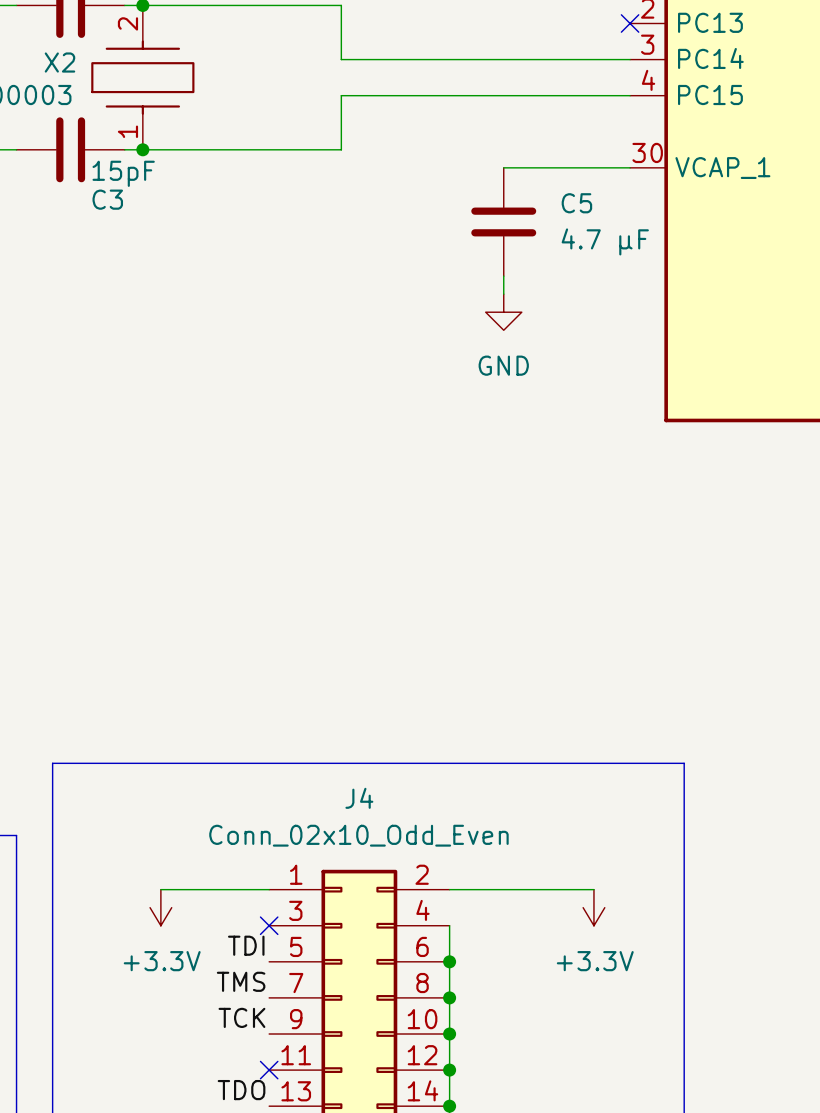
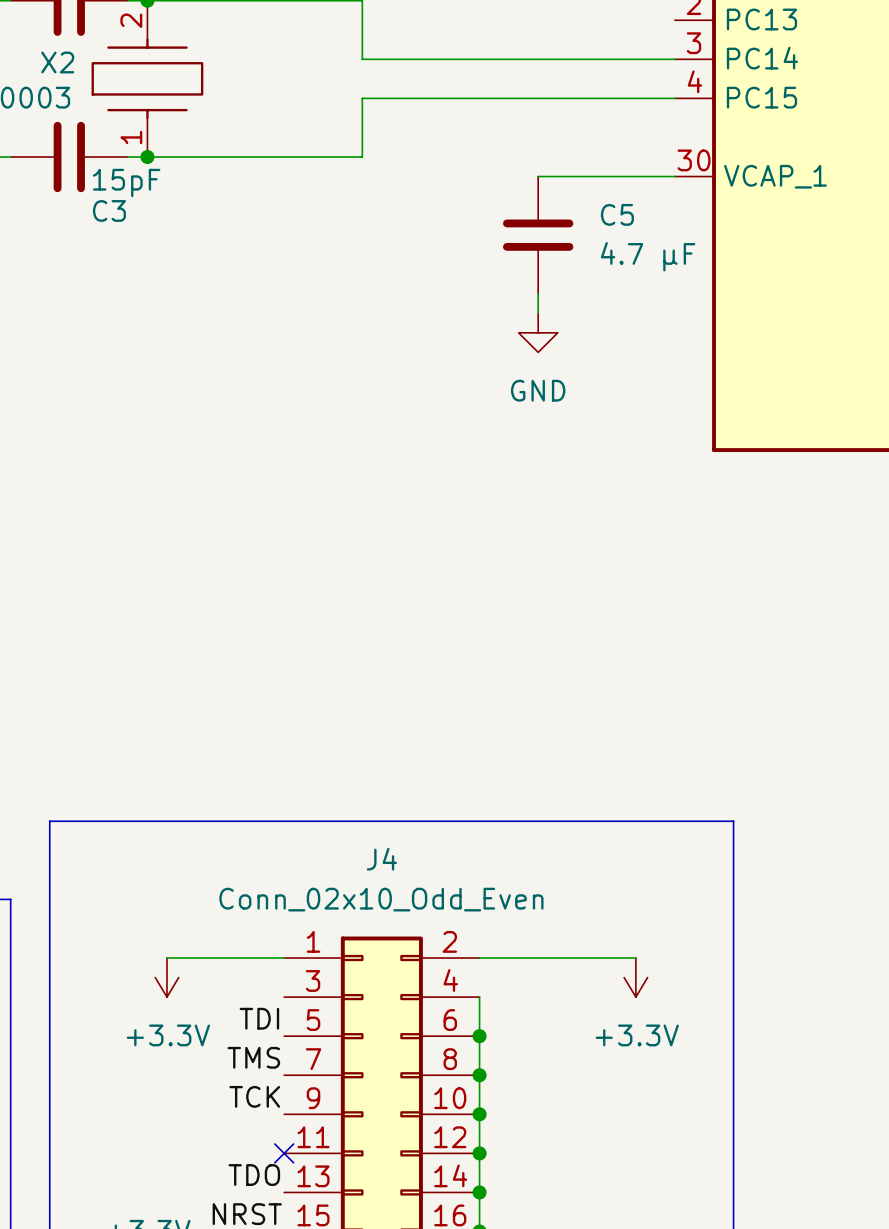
no-connect mark: (630, 23) -> none
no-connect mark: (269, 925) -> none

